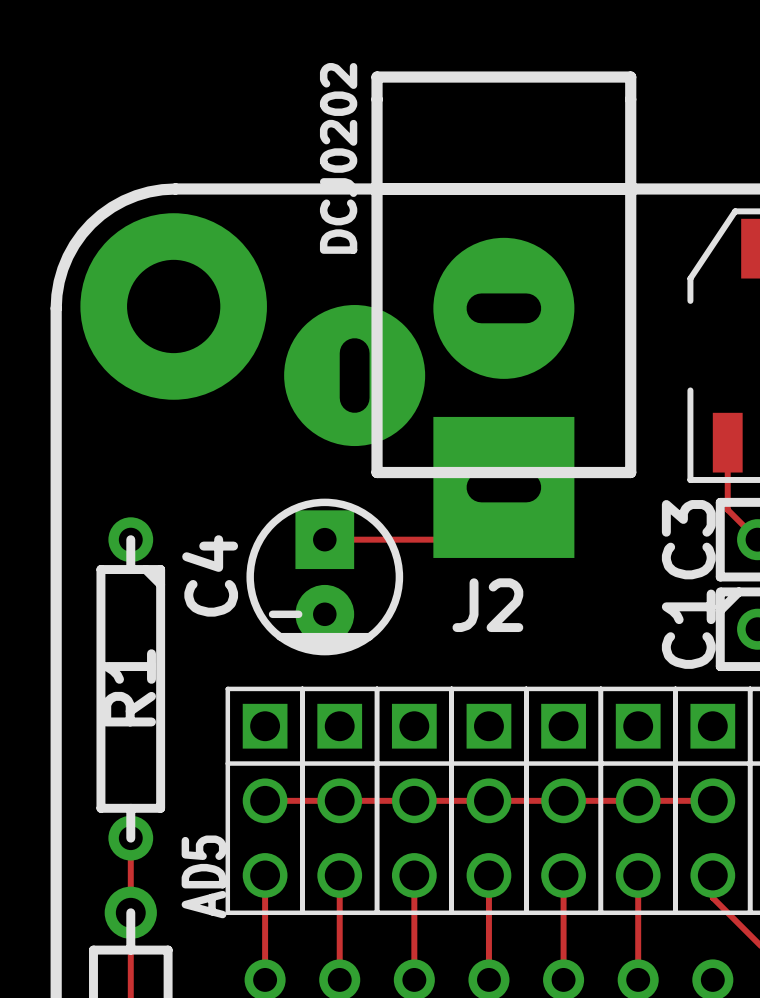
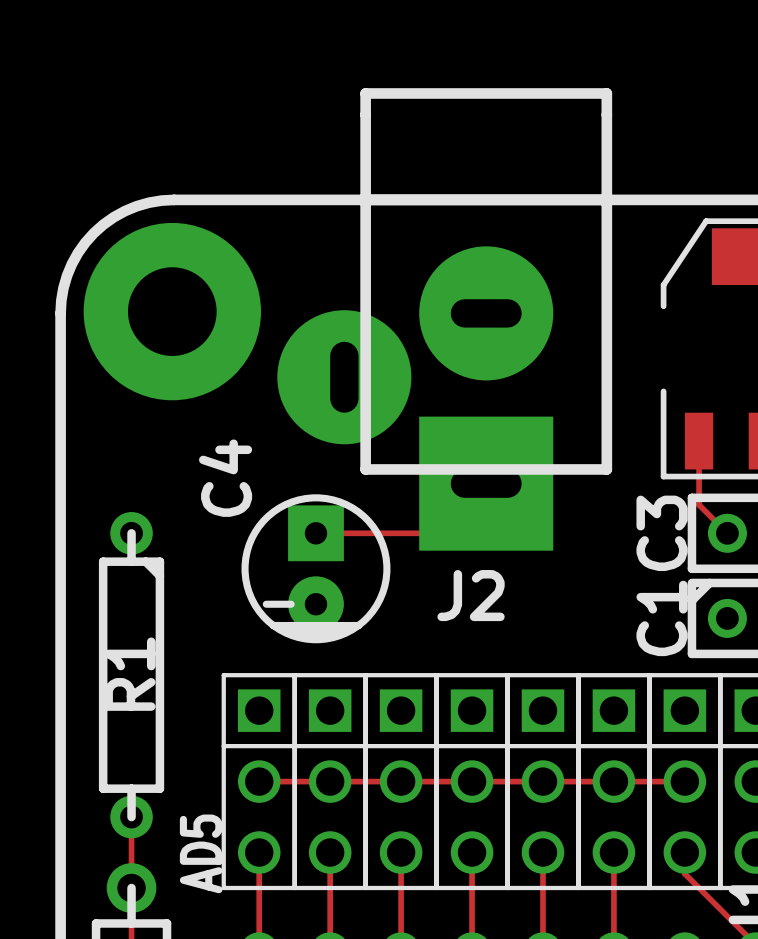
J2 value: DCJ0202 (338, 158) -> none
C4 name position: C4 (210, 575) -> C4 (225, 478)

